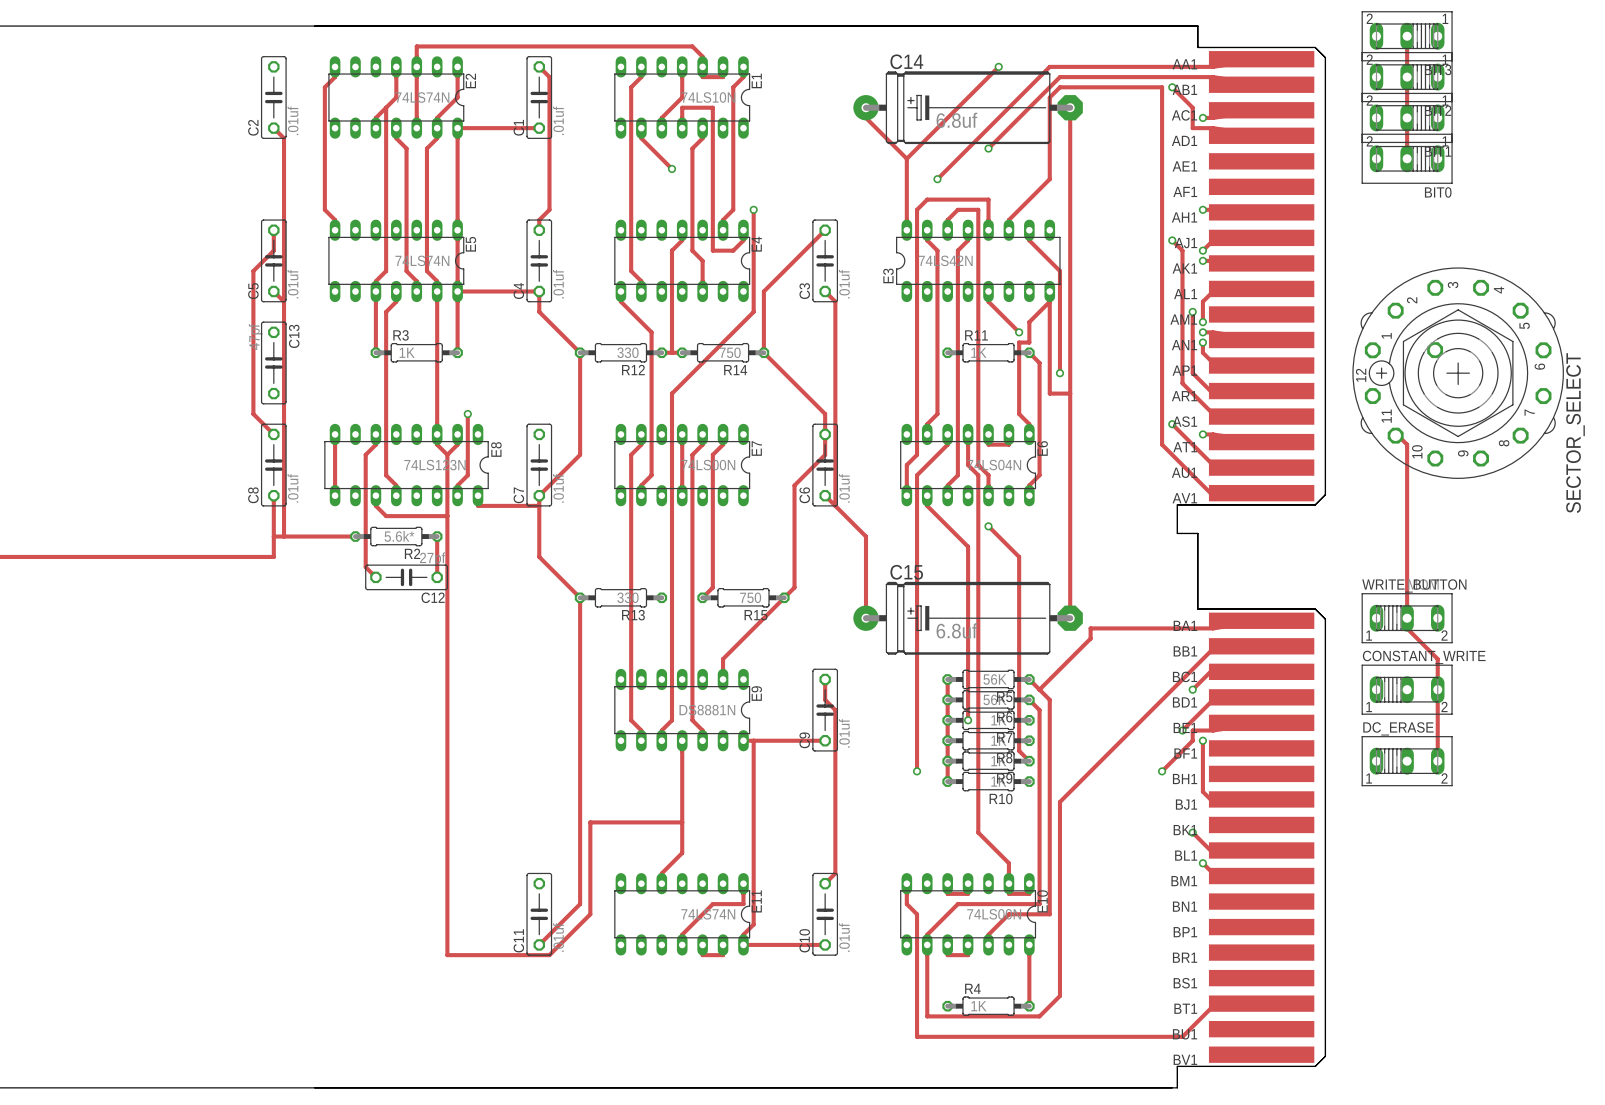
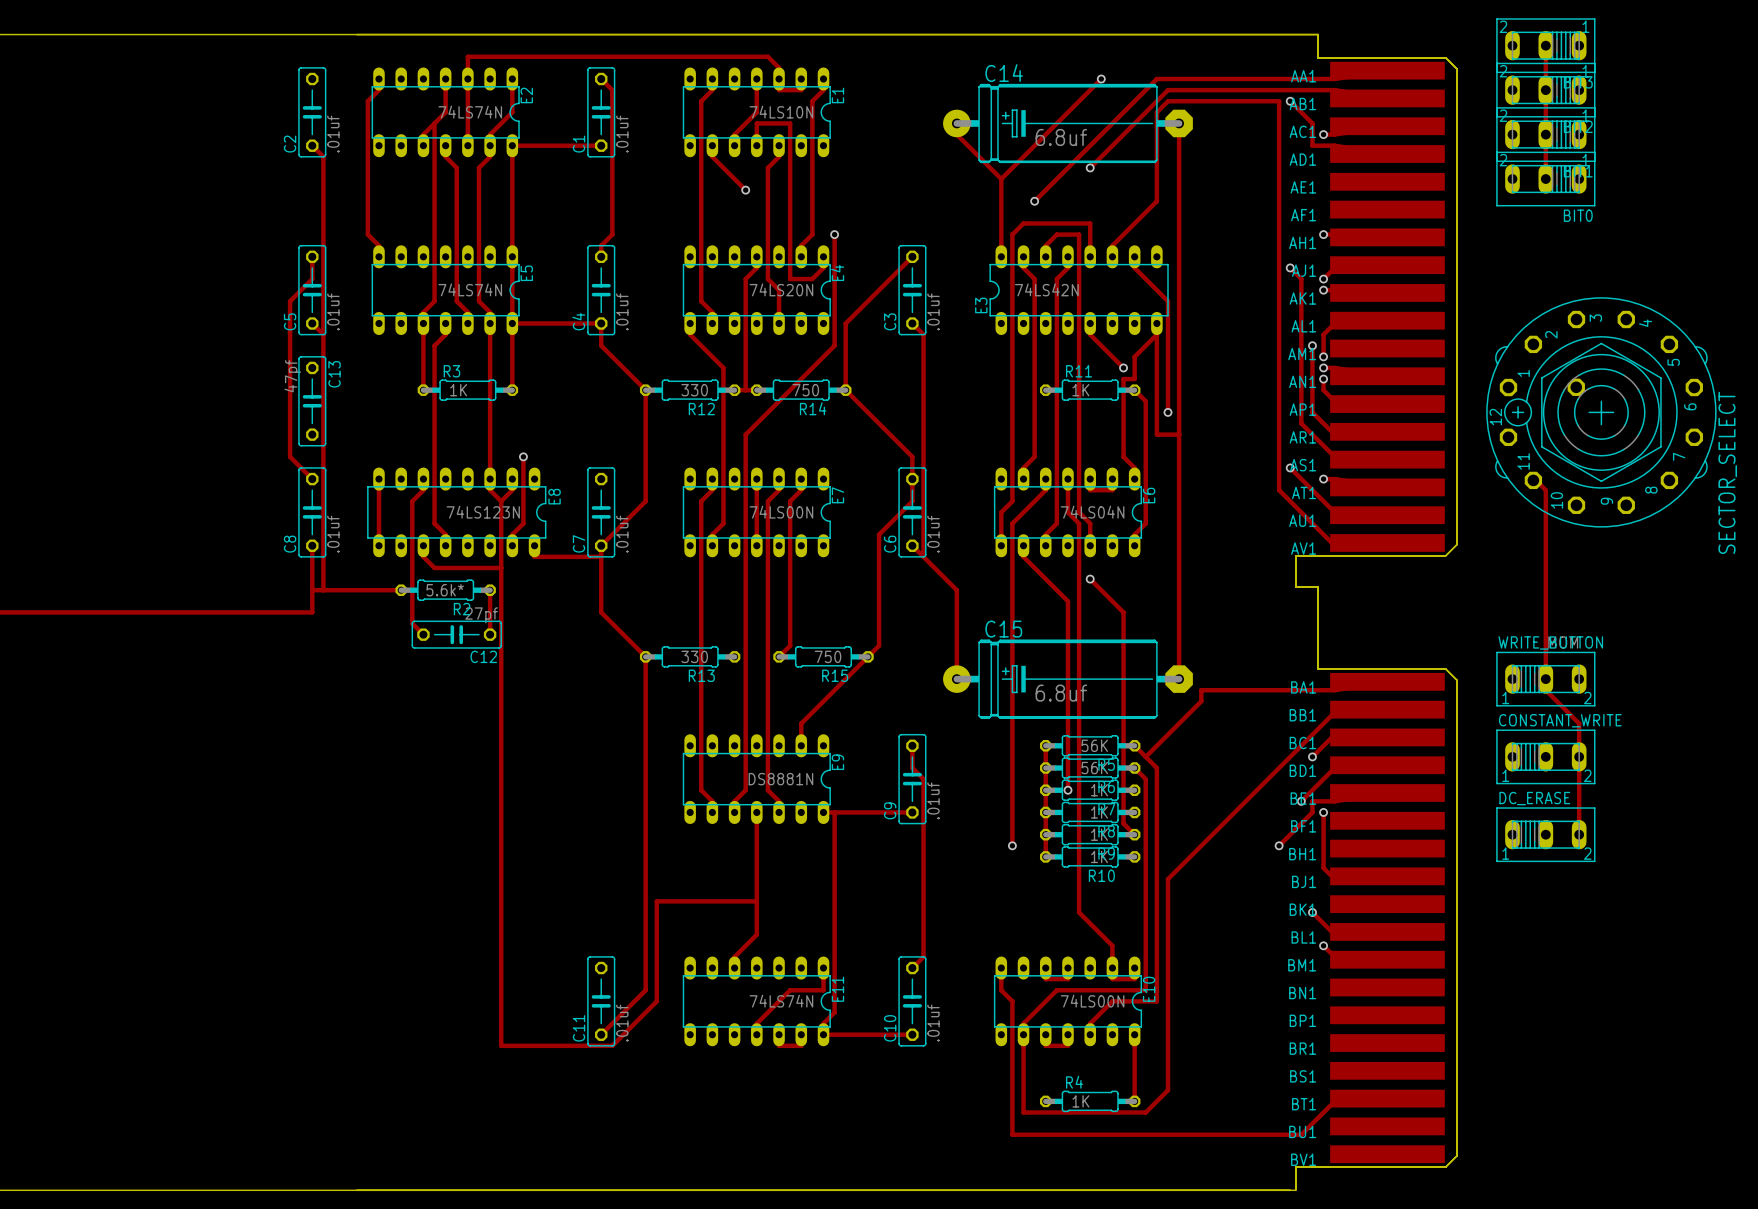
E4 value: none -> 74LS20N (781, 289)

